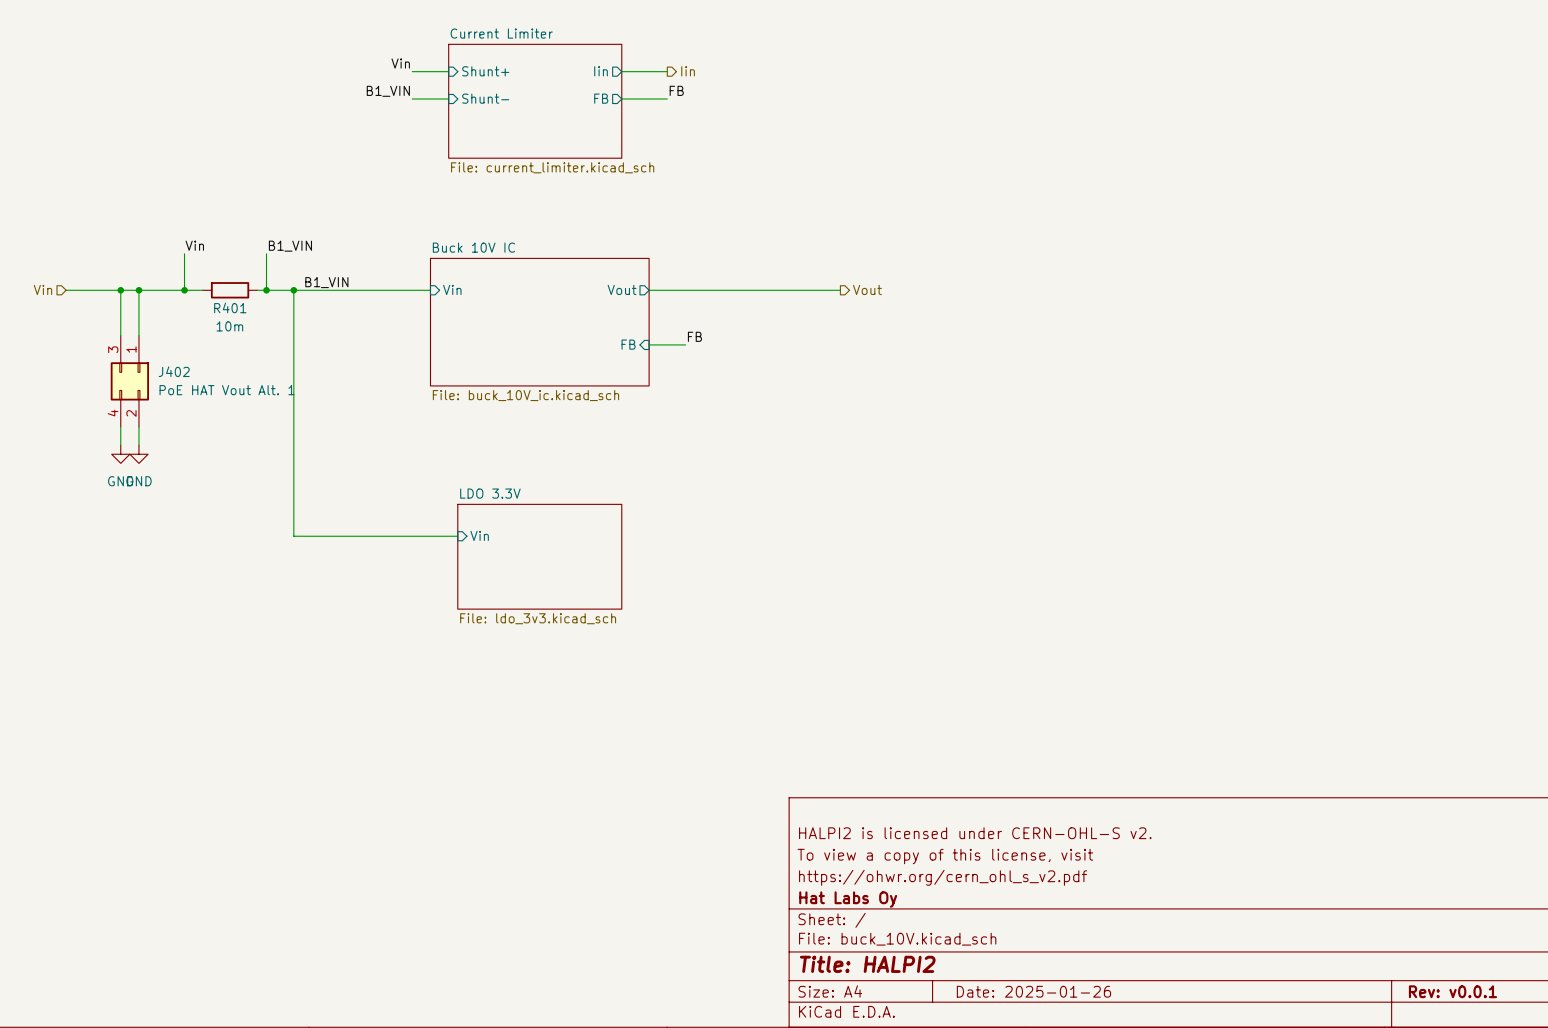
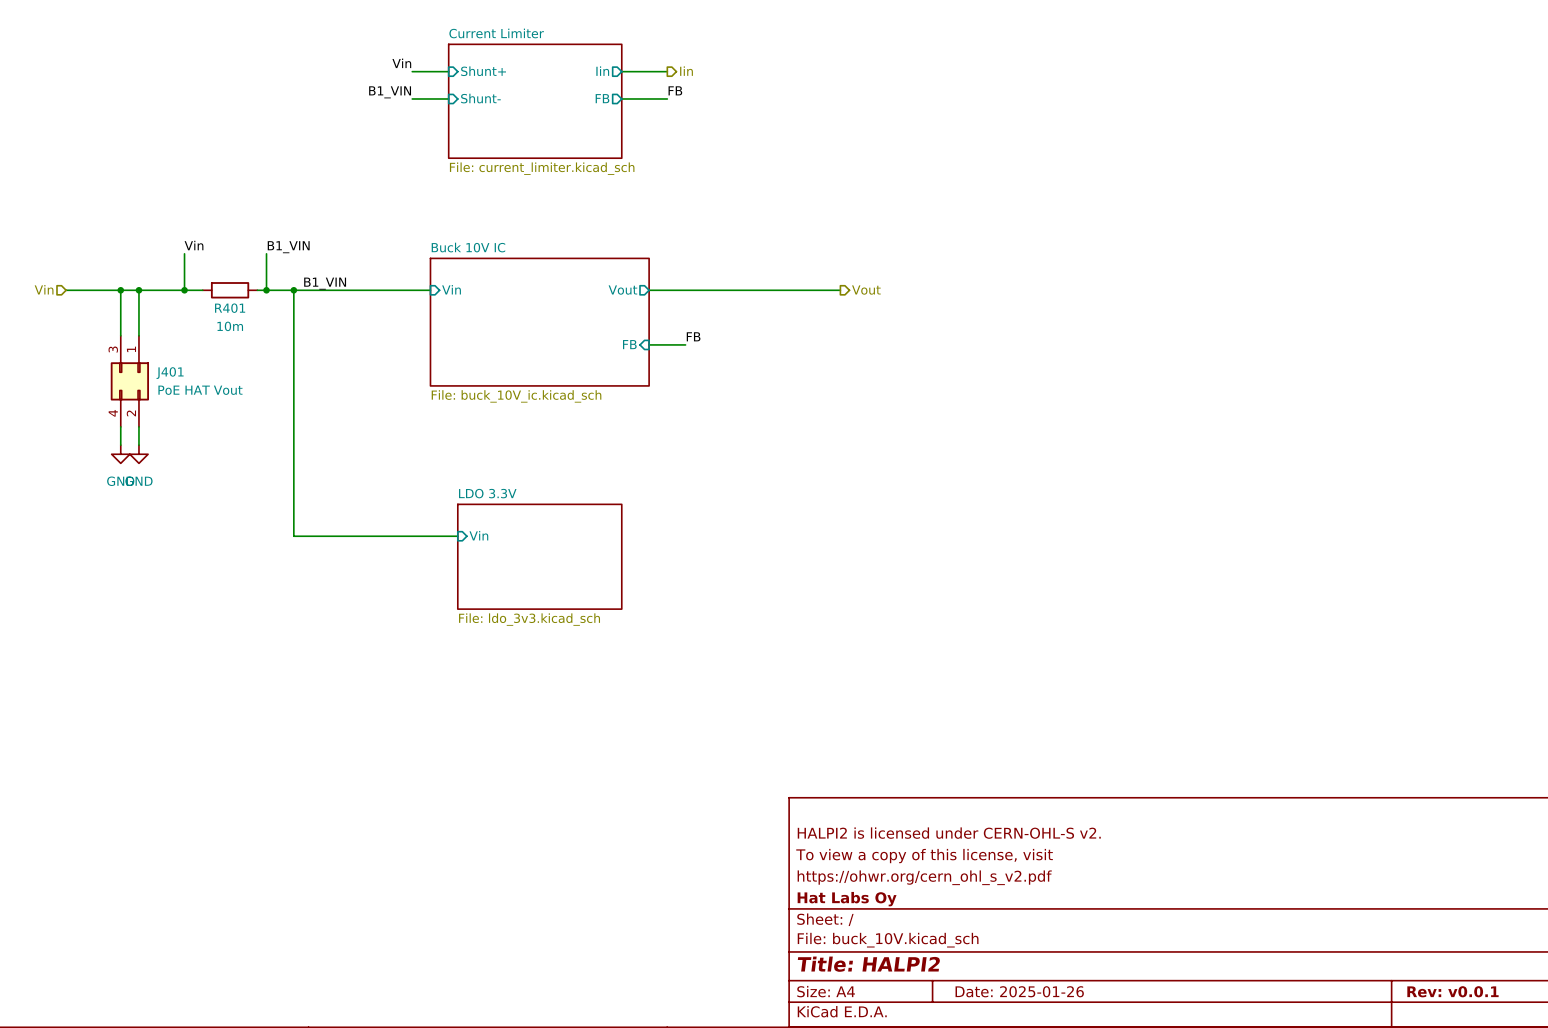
J402 name: J402 (174, 371) -> J401 (170, 373)
J402 value: PoE HAT Vout Alt. 1 (227, 390) -> PoE HAT Vout (200, 390)

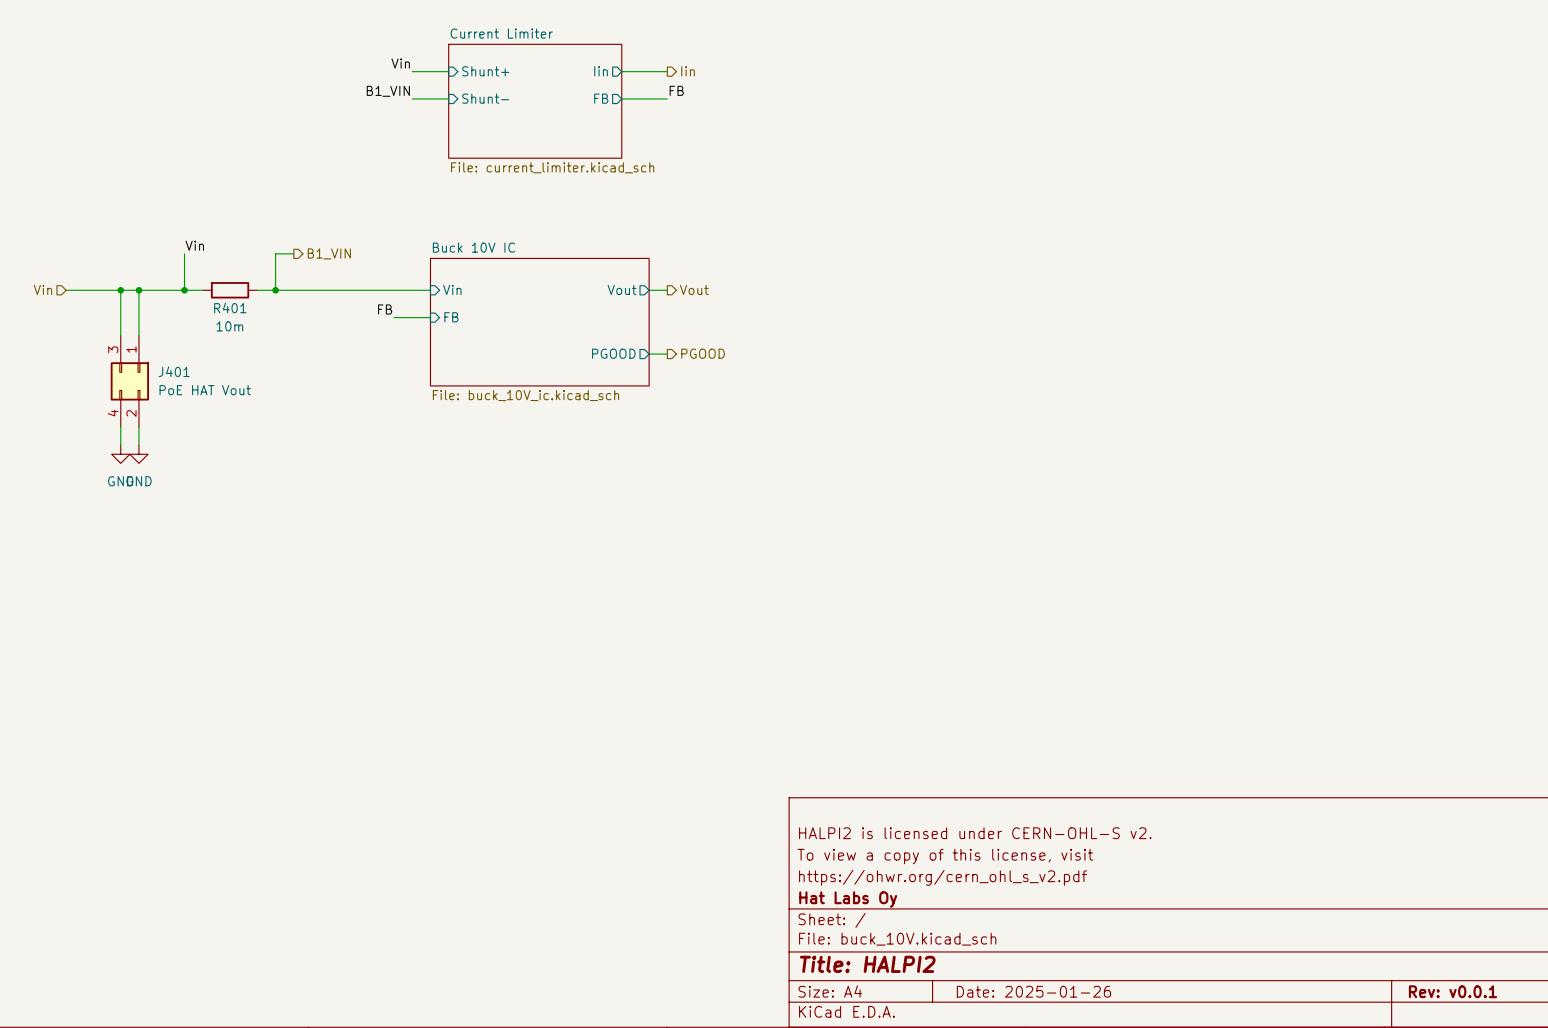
label: B1_VIN (288, 247) -> none
wire: (266, 253) (266, 290) -> none
wire: none -> (293, 253) (275, 253) (275, 290)
hierarchical label: none -> B1_VIN (329, 253)
label: B1_VIN (325, 283) -> none
junction: (266, 290) -> none
junction: none -> (275, 290)
wire: (293, 290) (293, 536) (457, 536) -> none
junction: (293, 290) -> none
wire: (667, 290) (840, 290) -> none
hierarchical label position: Vout (866, 290) -> Vout (694, 289)
label: none -> FB (385, 309)
wire: none -> (394, 317) (430, 317)
sheet pin: none -> FB (451, 317)
label: FB (693, 336) -> none
sheet pin: FB (629, 344) -> none
wire: (649, 344) (685, 344) -> none
sheet pin: none -> PGOOD (613, 353)
hierarchical label: none -> PGOOD (703, 353)
wire: none -> (649, 354) (667, 354)
sheet pin: Vin (478, 535) -> none
sheet LDO 3.3V: File: ldo_3v3.kicad_sch (539, 556) -> none

